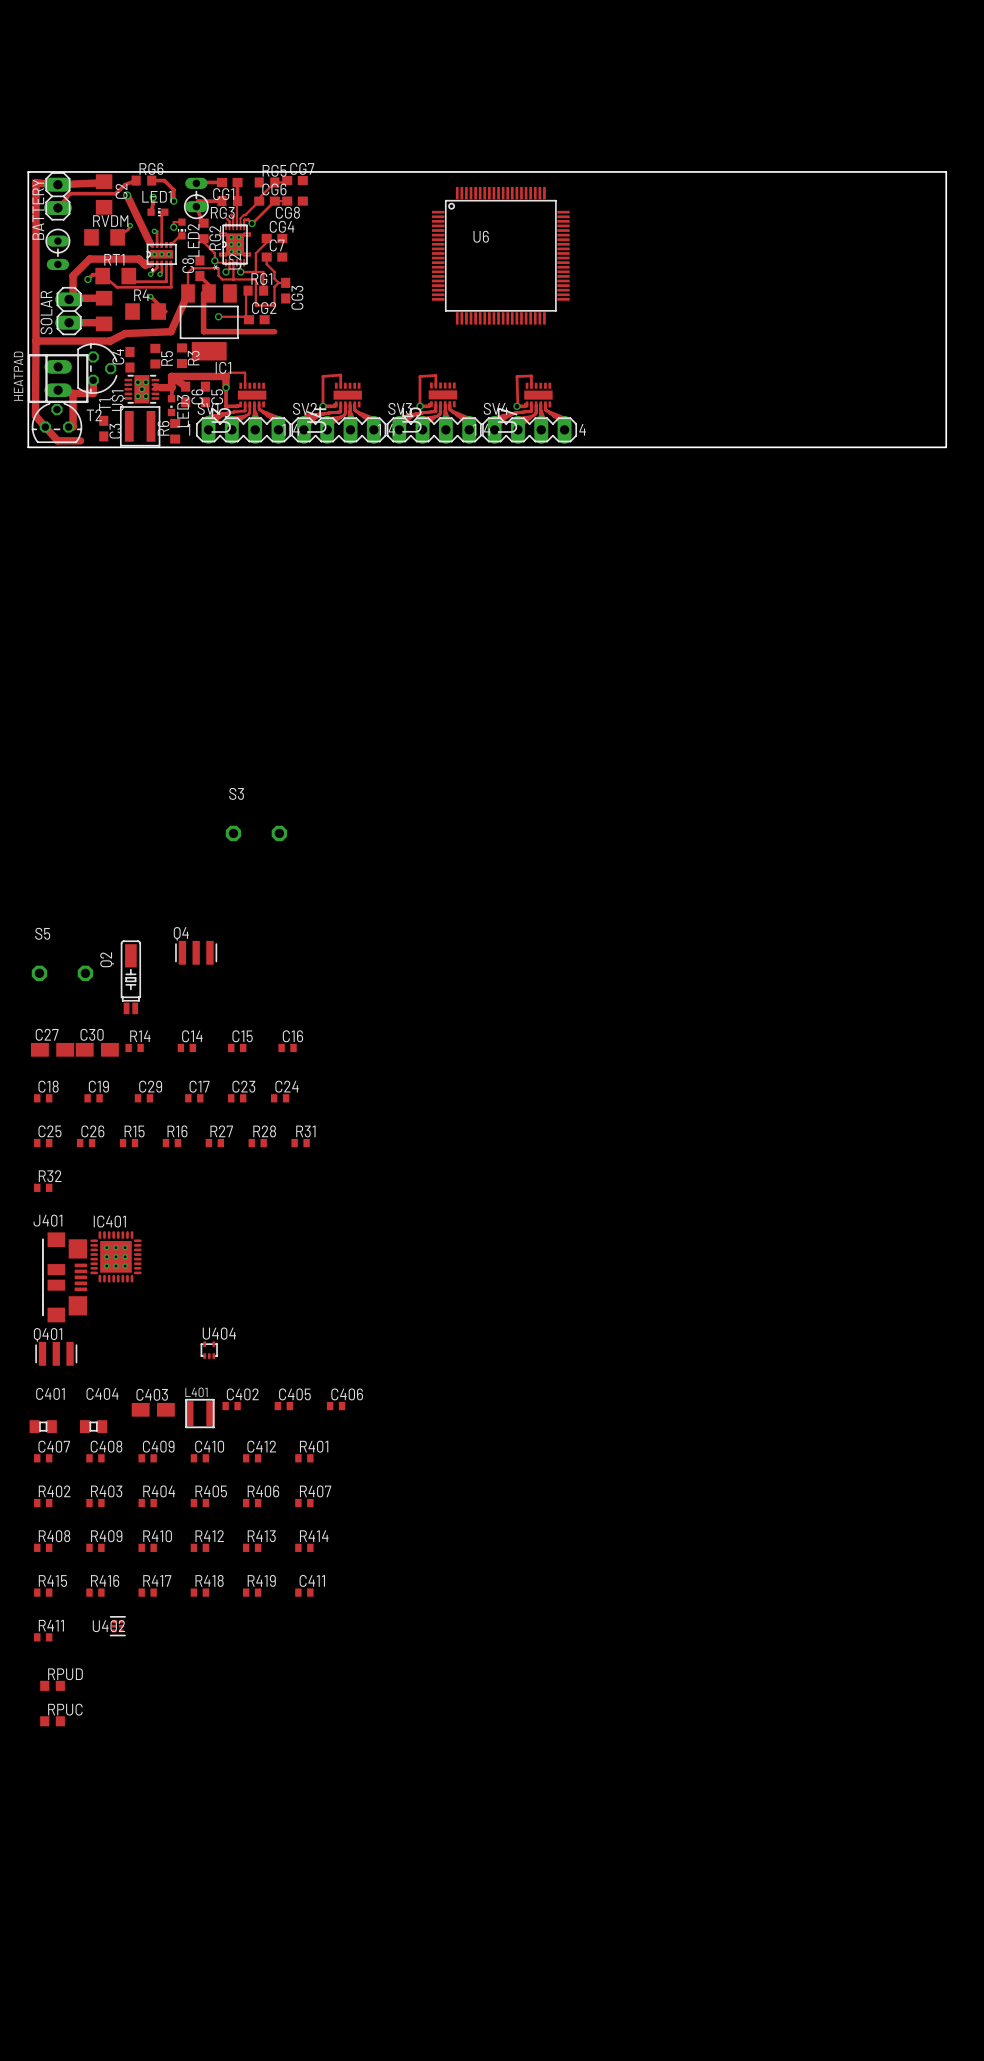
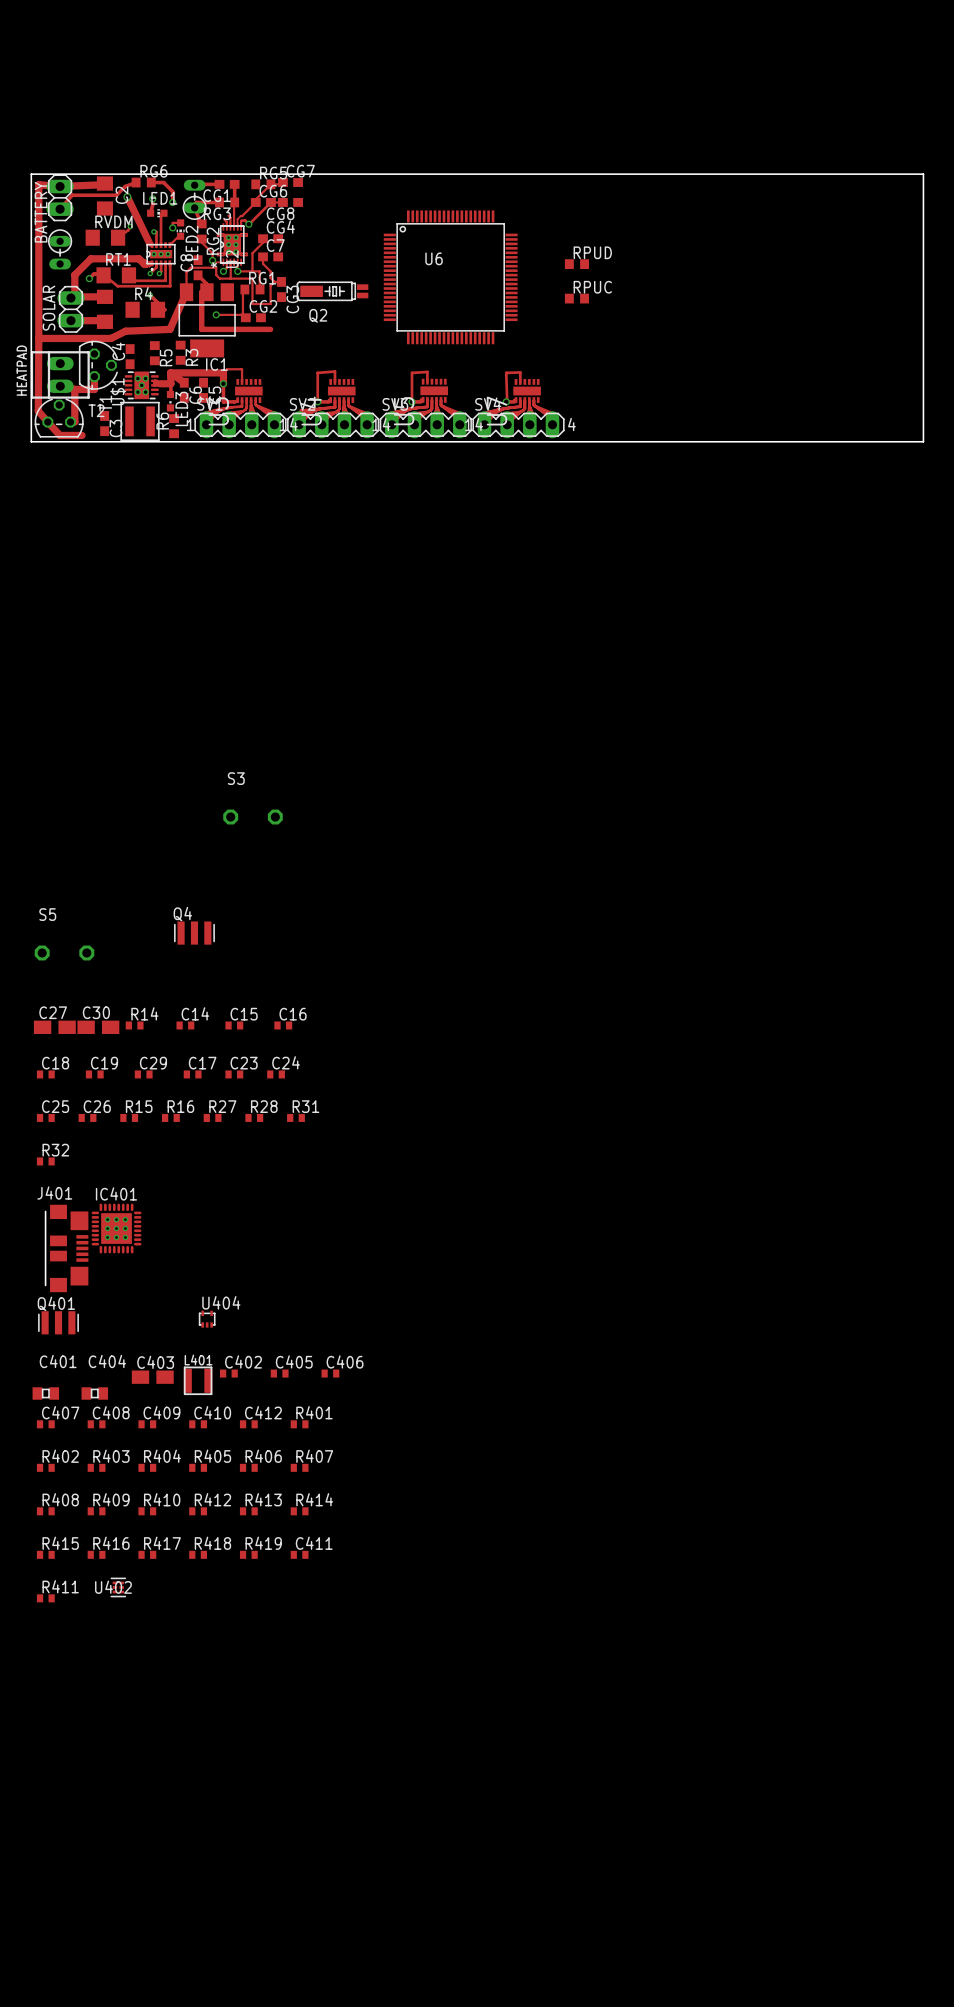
U6 position: (500, 255) -> (450, 277)
RPUD: none -> (576, 264)
RPUC: none -> (576, 298)
Q2 rotation: 0° (130, 977) -> 90° counterclockwise (332, 291)
Q2 position: (130, 977) -> (332, 291)
RPUD: (52, 1685) -> none
RPUC: (52, 1721) -> none

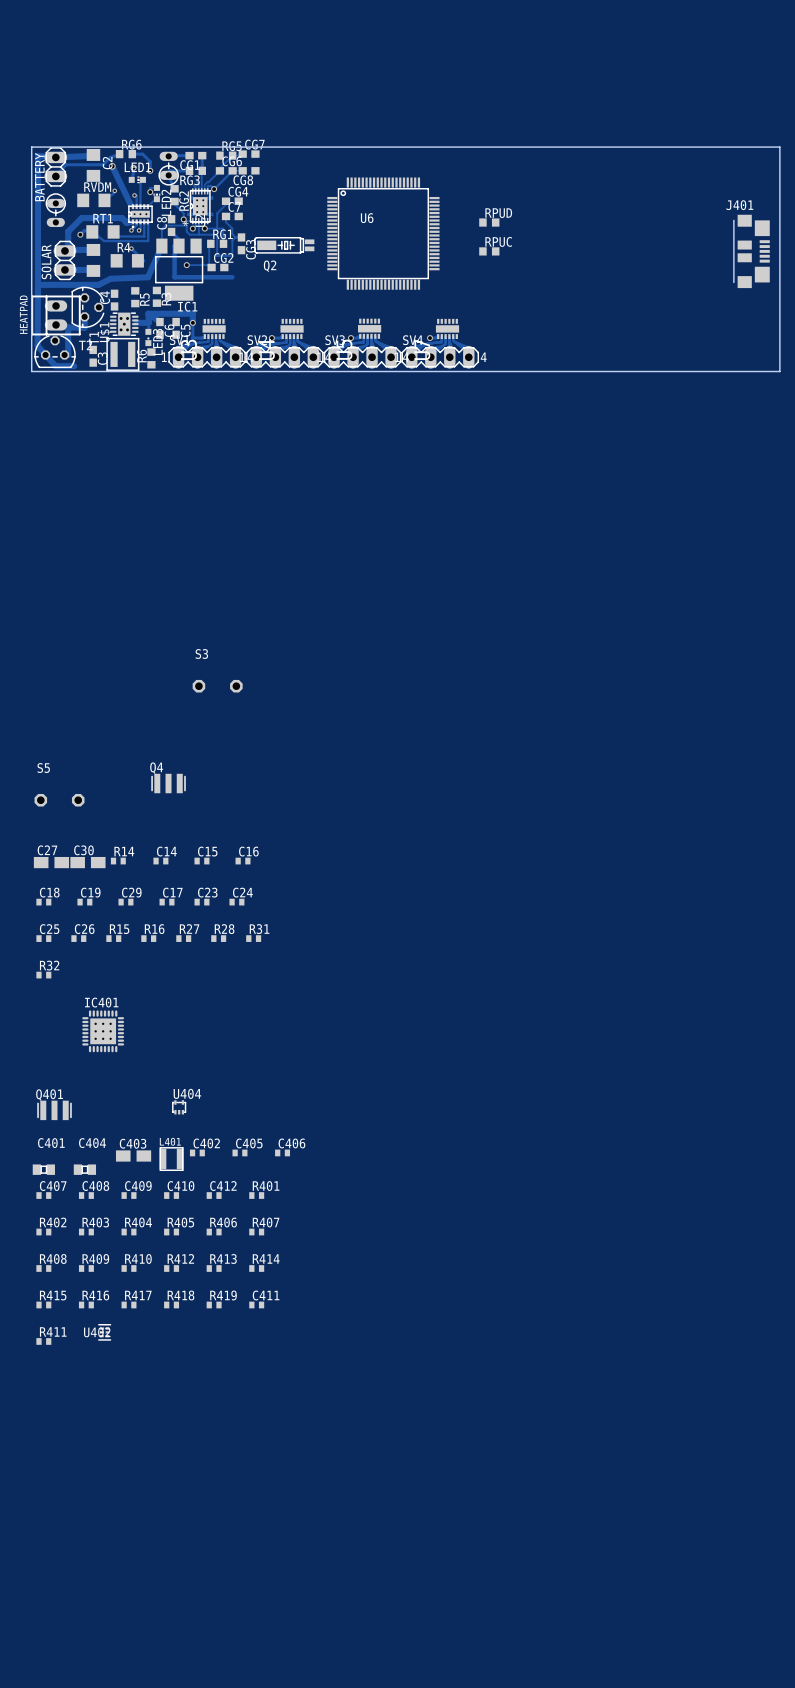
track: (223, 372) (227, 369) (241, 369) (242, 381) -> none
track: (334, 381) (334, 371) (317, 372) (317, 401) -> none
track: (427, 381) (427, 371) (412, 372) (412, 401) -> none
track: (520, 381) (520, 372) (506, 372) (507, 401) -> none
J401 position: (66, 1248) -> (751, 251)

